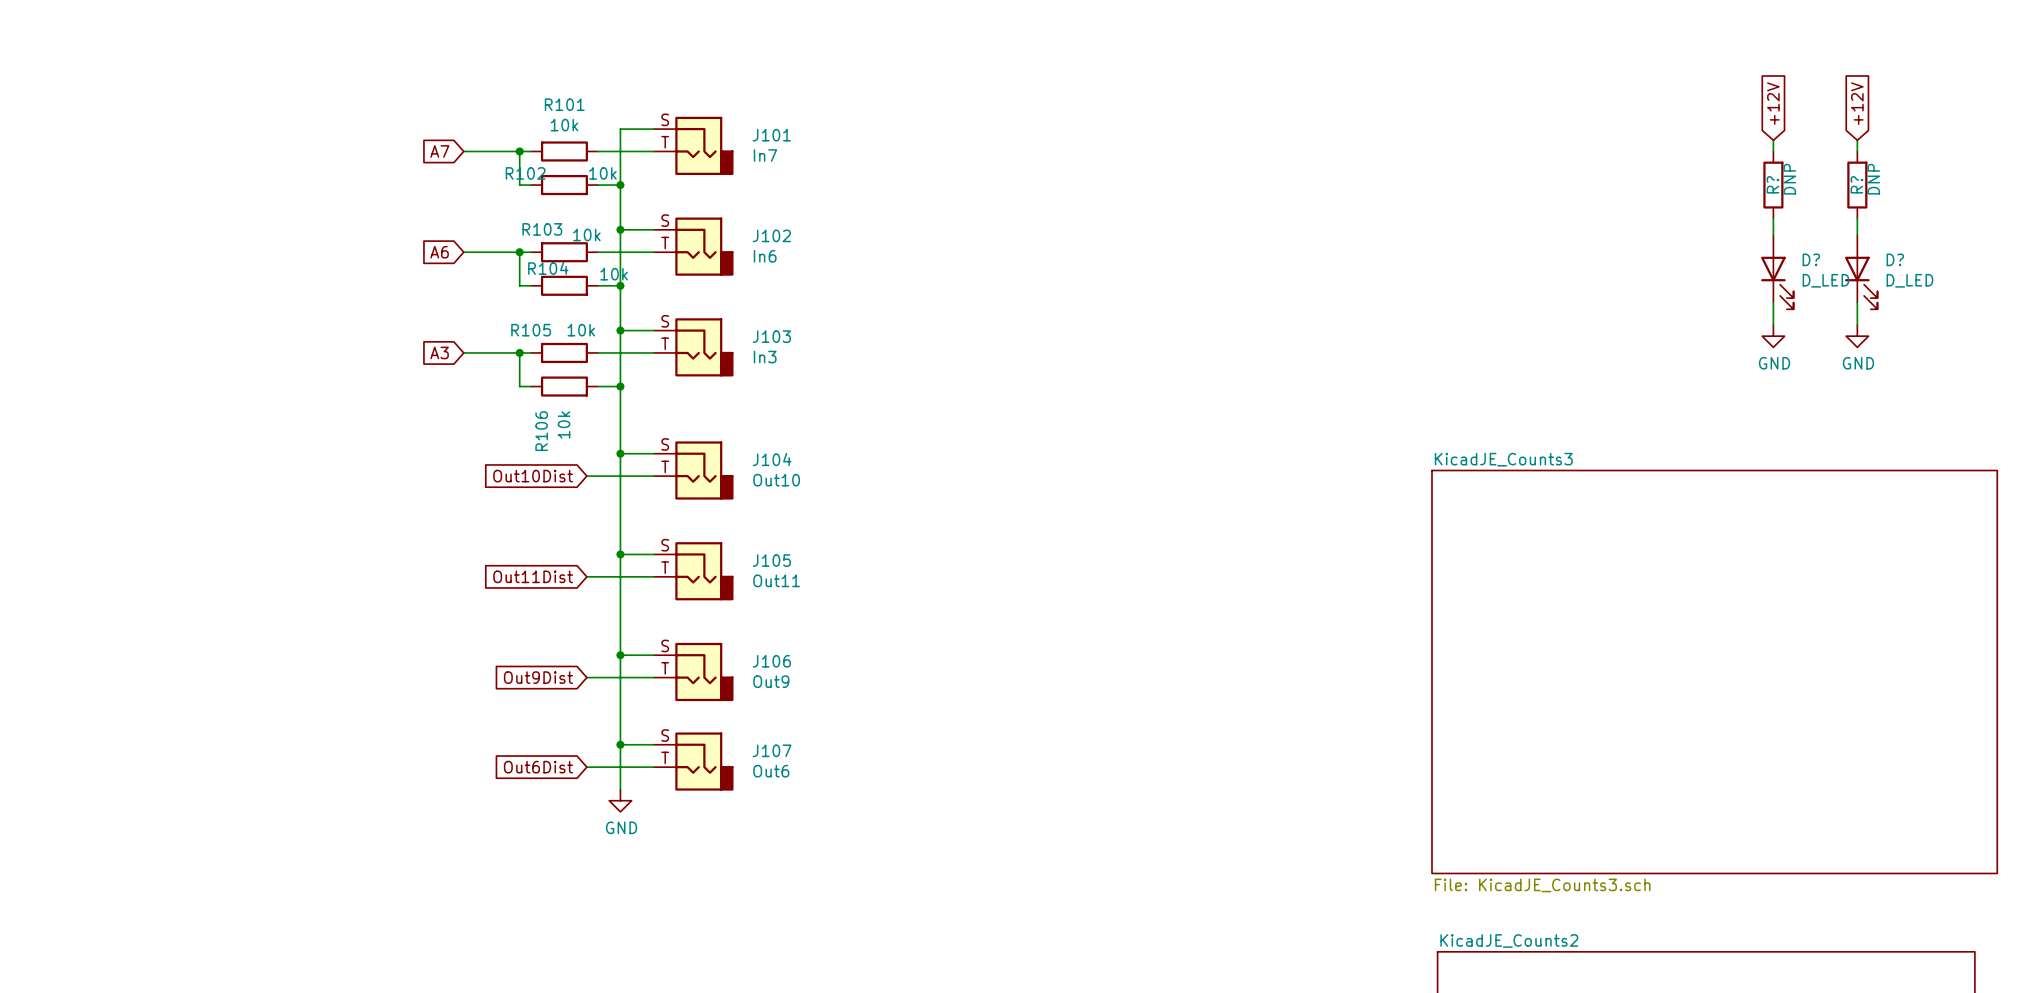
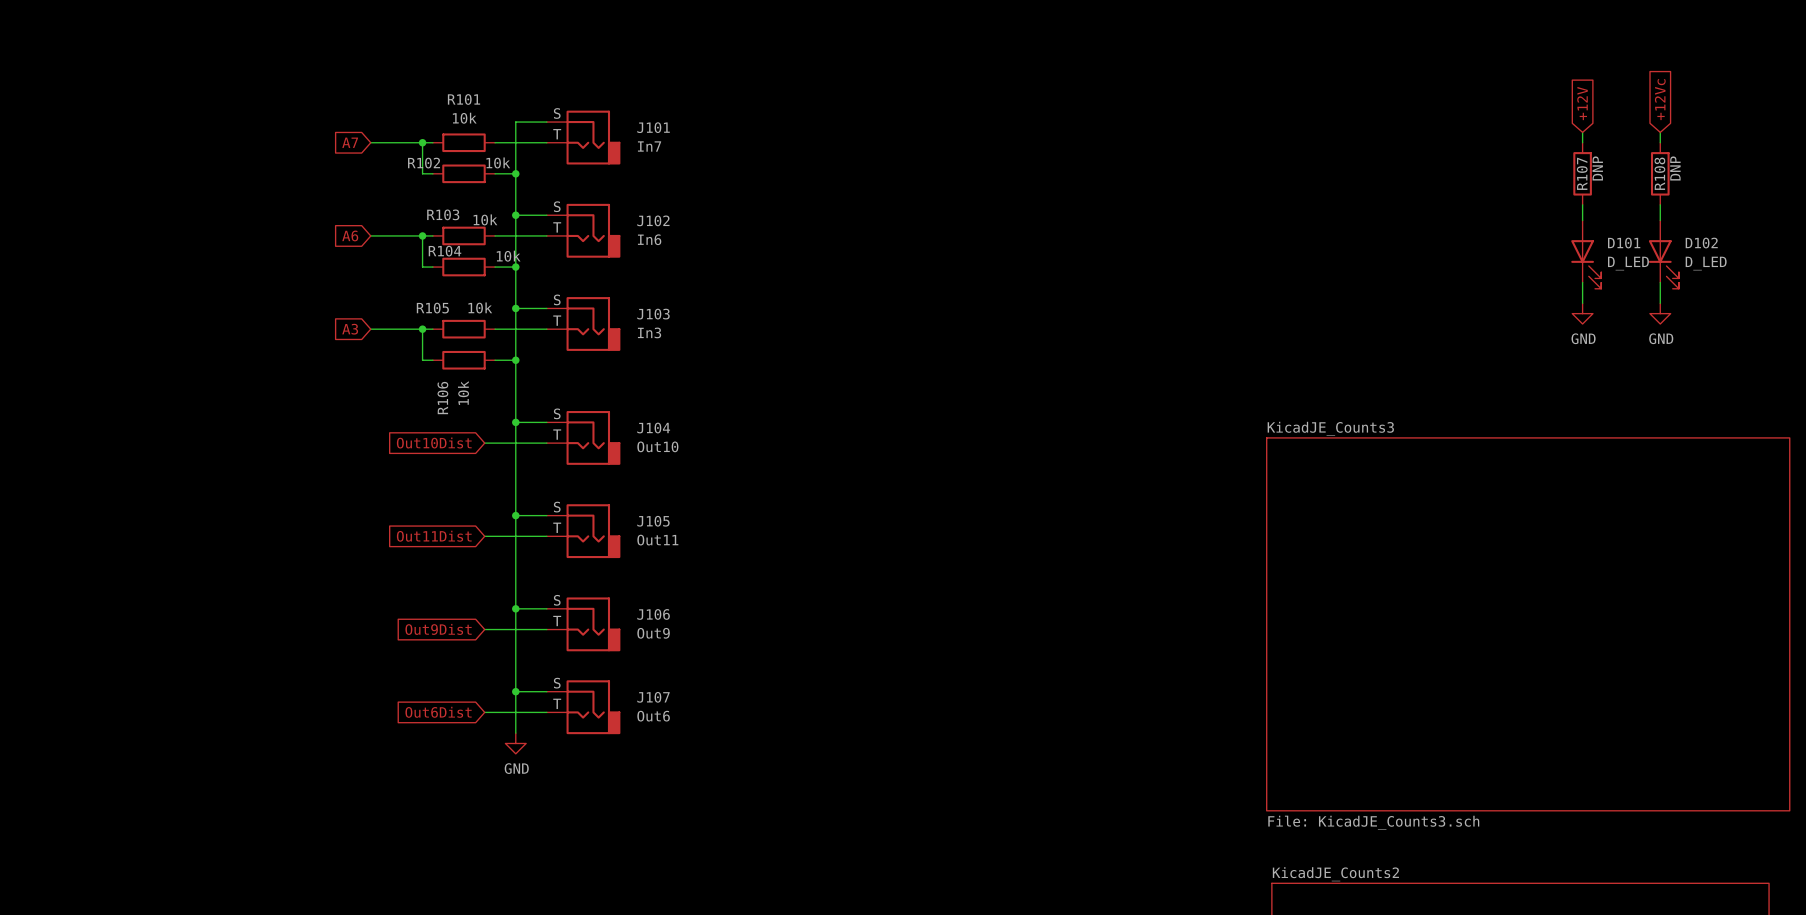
global label: +12V (1857, 103) -> +12Vc (1660, 99)
R? name: R? (1772, 184) -> R107 (1582, 173)
R? name: R? (1856, 184) -> R108 (1659, 173)
D? name: D? (1811, 259) -> D101 (1624, 243)
D? name: D? (1895, 259) -> D102 (1701, 243)

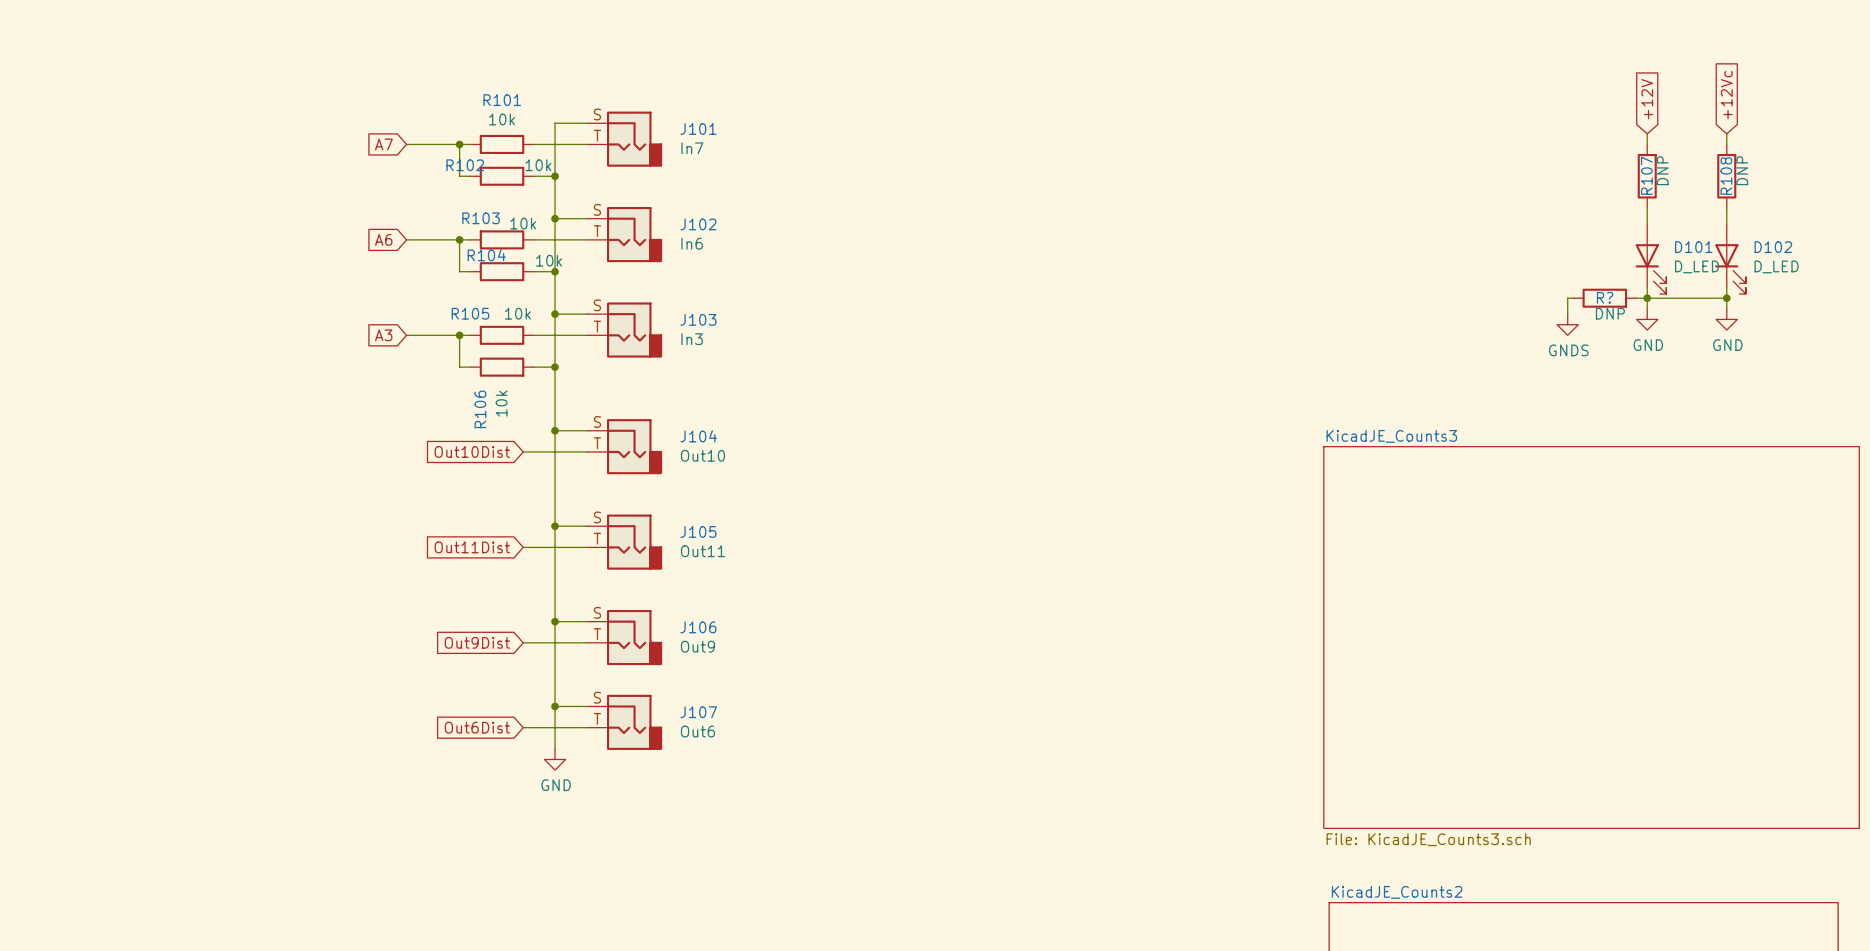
wire: none -> (1573, 298) (1567, 298) (1567, 314)
R?: none -> DNP (1604, 298)
wire: none -> (1636, 298) (1726, 298)
junction: none -> (1647, 298)
junction: none -> (1726, 298)
power symbol: none -> GNDS (1567, 324)

